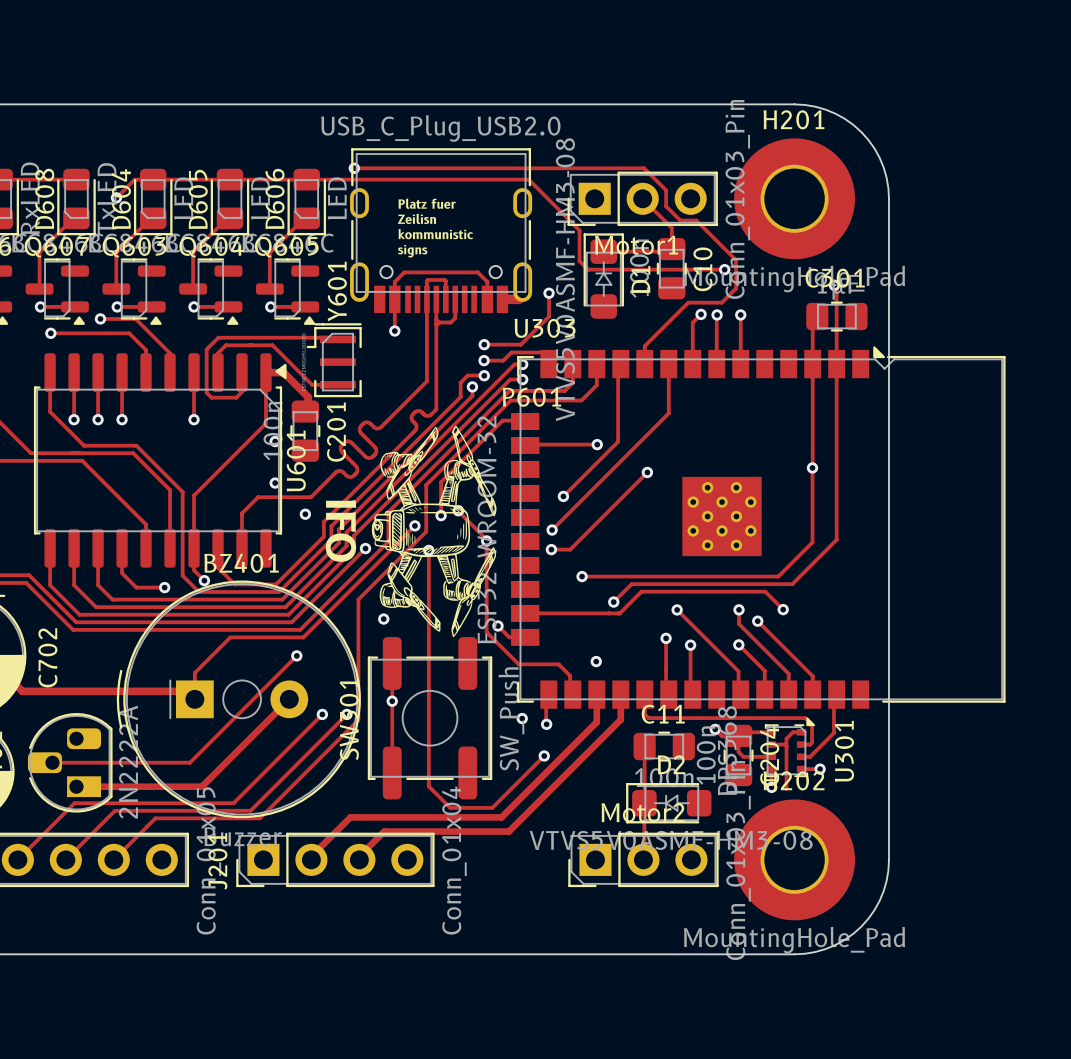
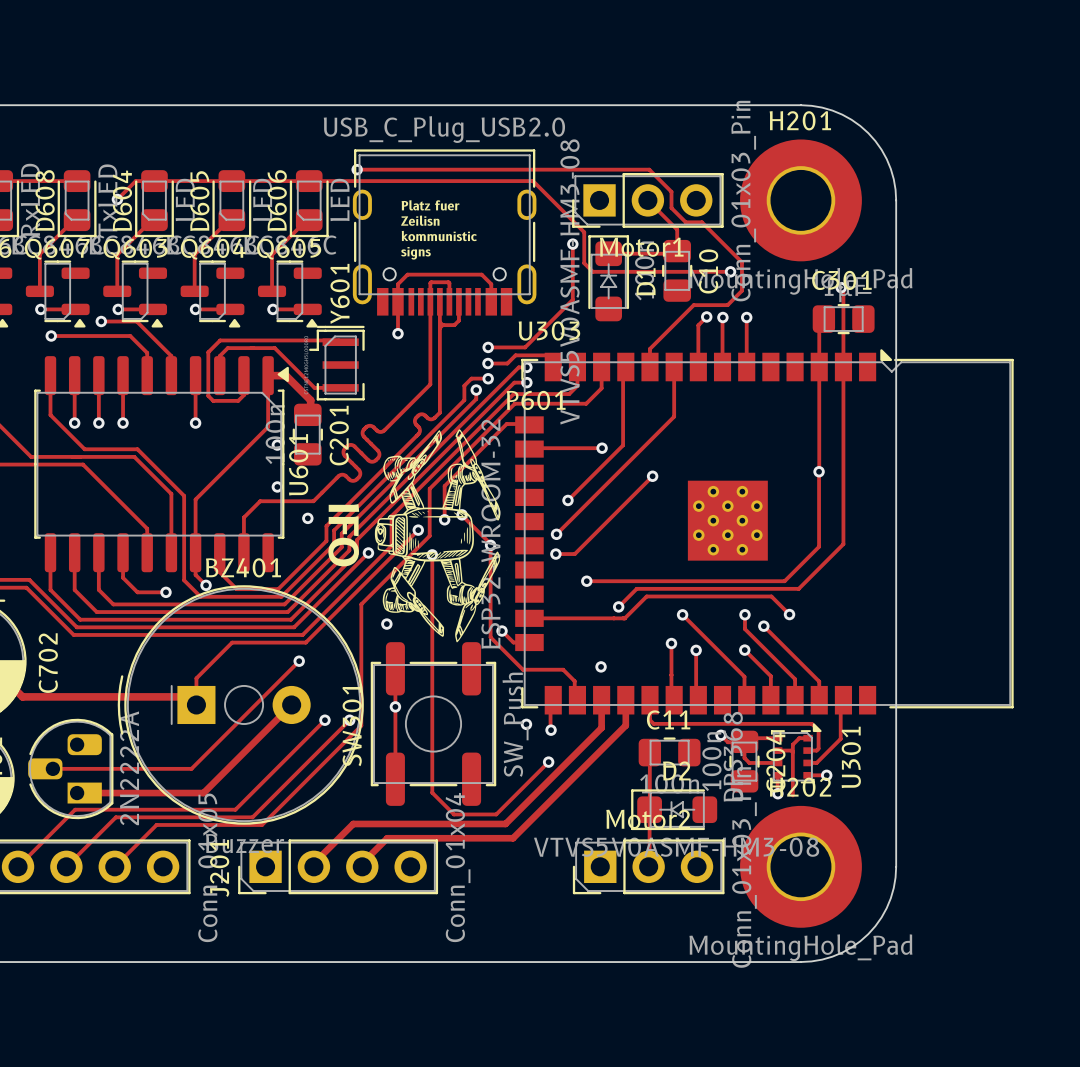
track: (549, 293) (549, 316) -> (572, 244) (572, 299) (553, 319)
via position: (549, 293) -> (572, 244)
track: (502, 299) (519, 299) -> none

